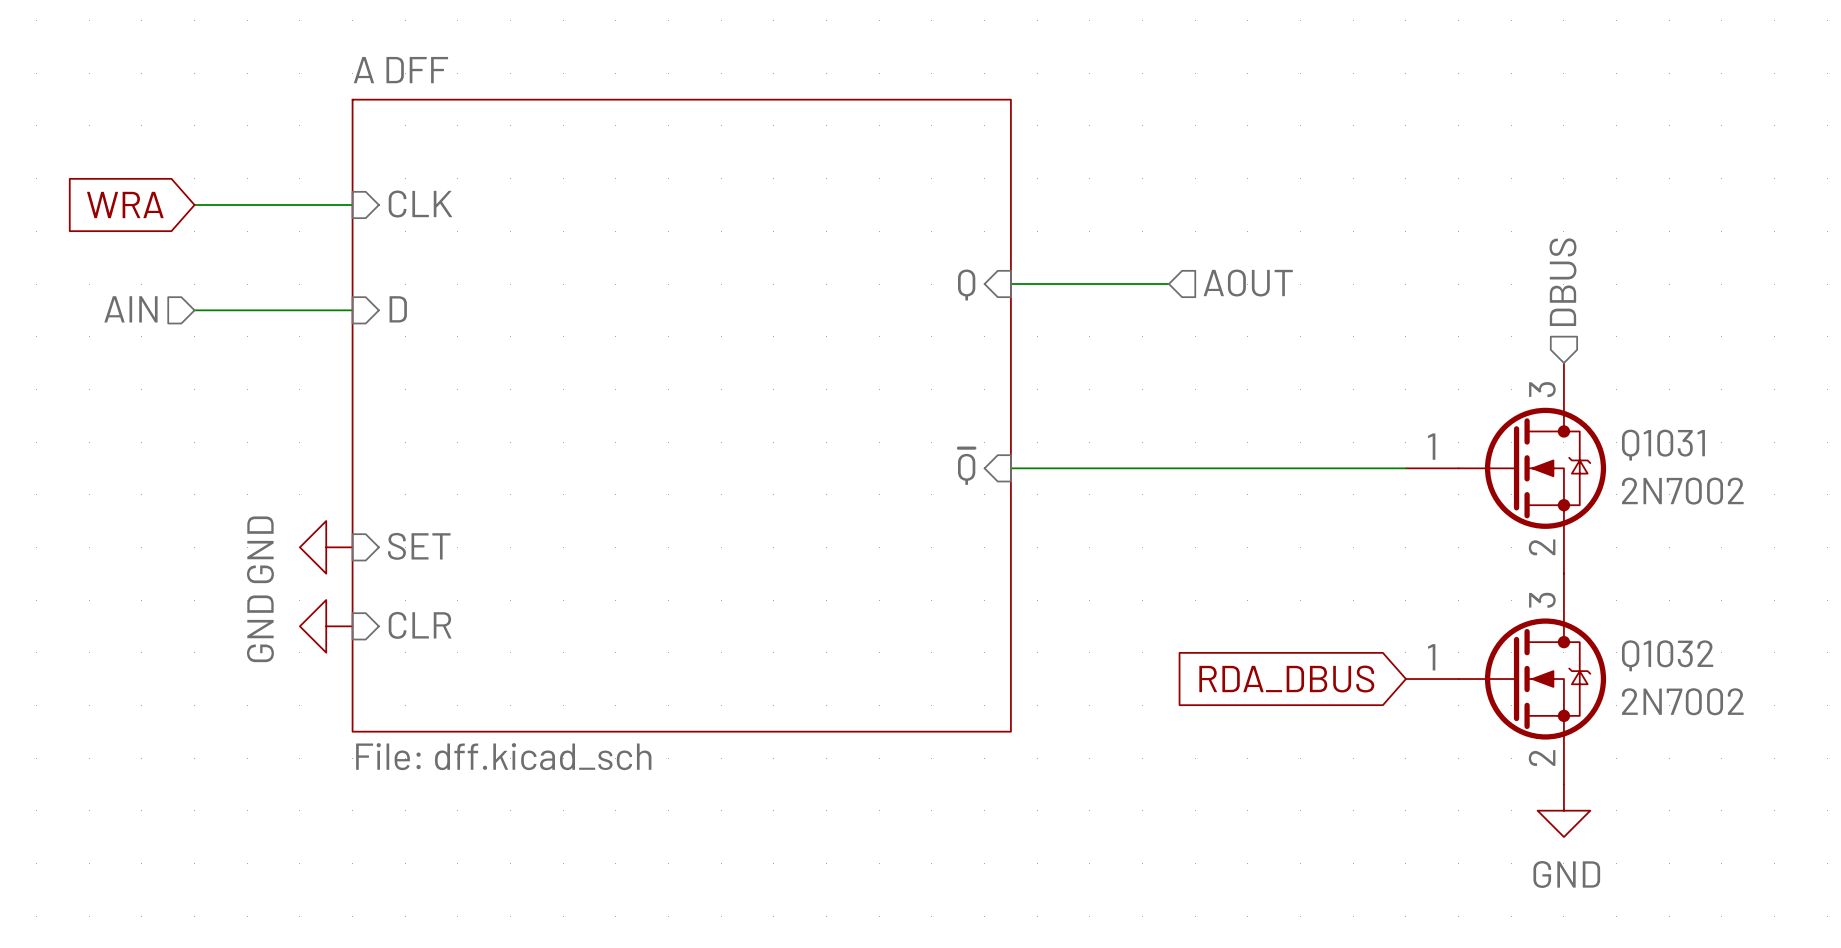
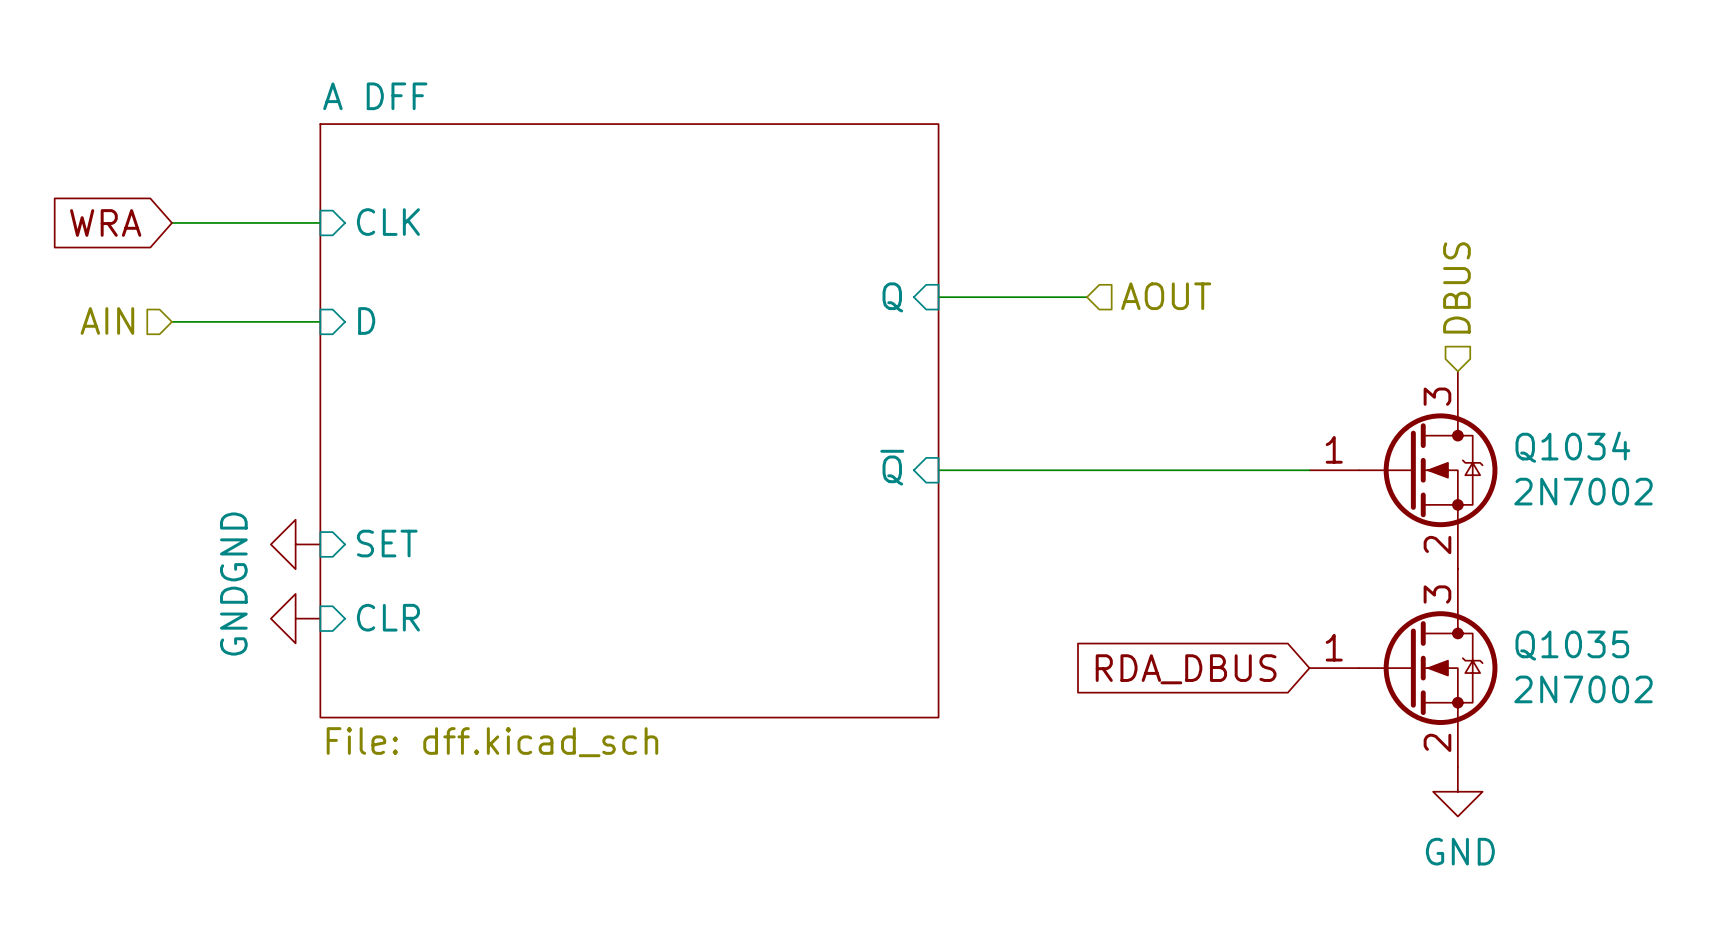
Q1031 name: Q1031 (1663, 445) -> Q1034 (1572, 447)
Q1032 name: Q1032 (1667, 655) -> Q1035 (1572, 645)

